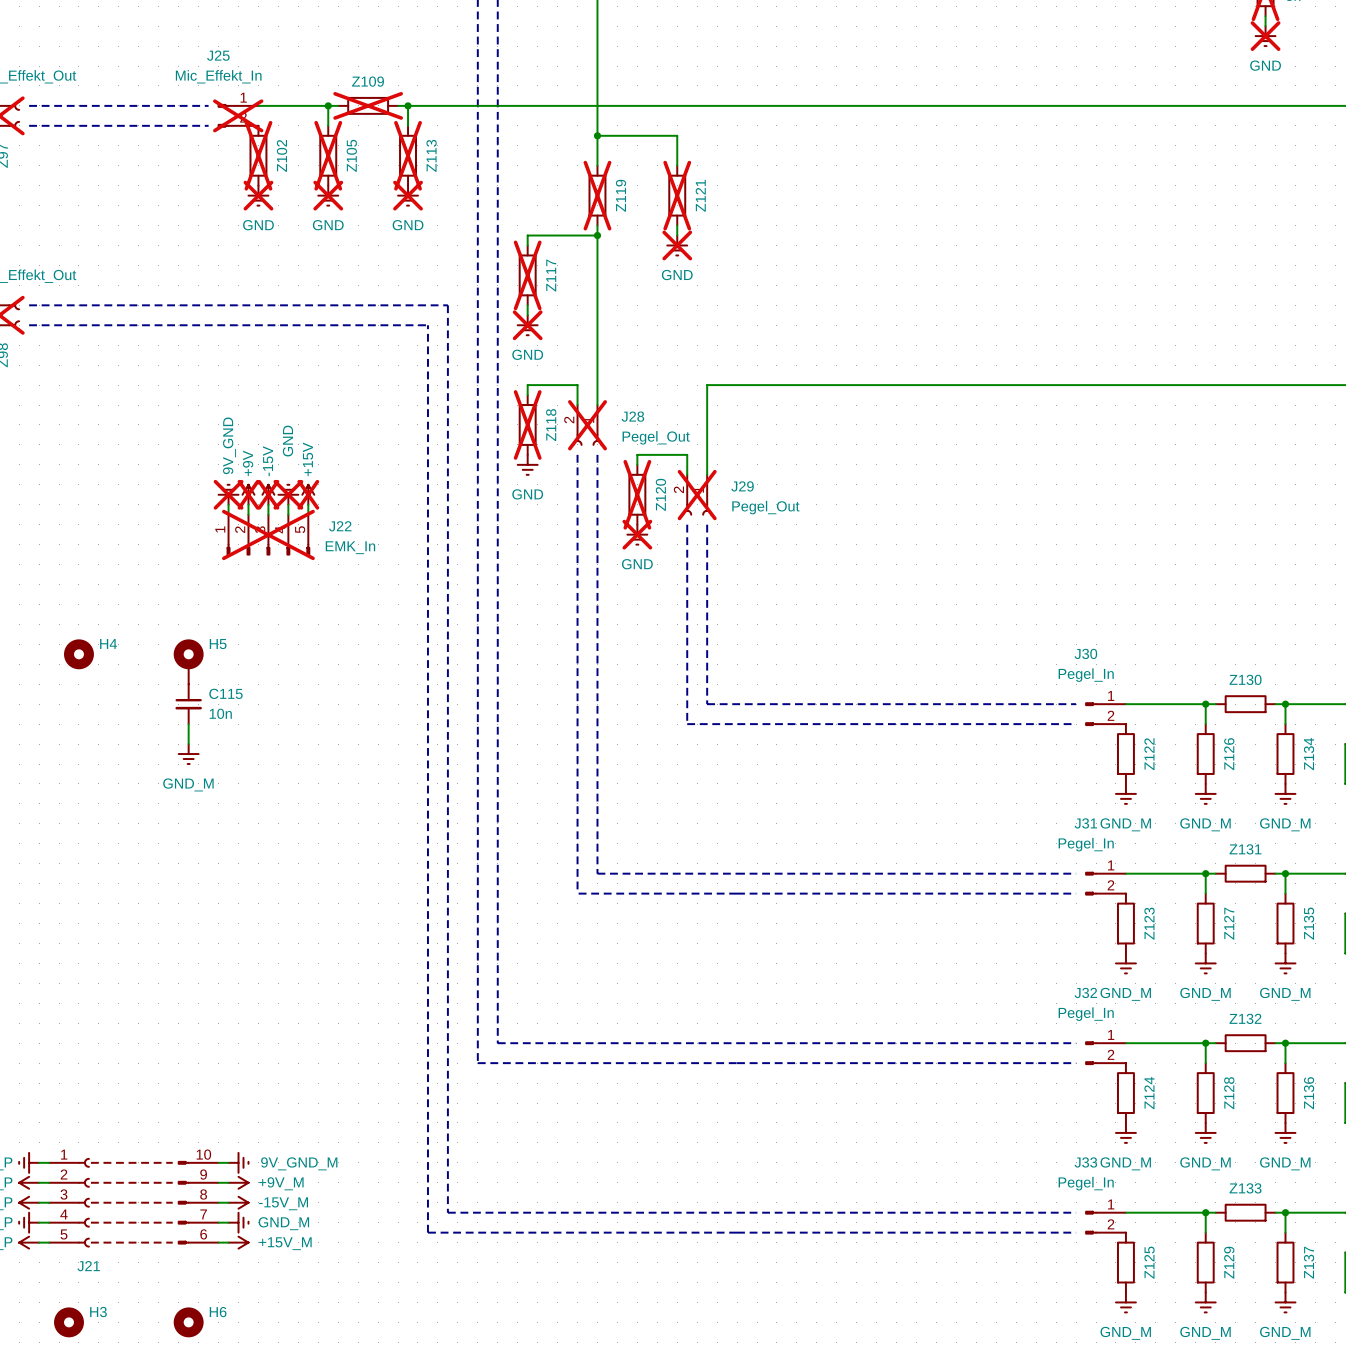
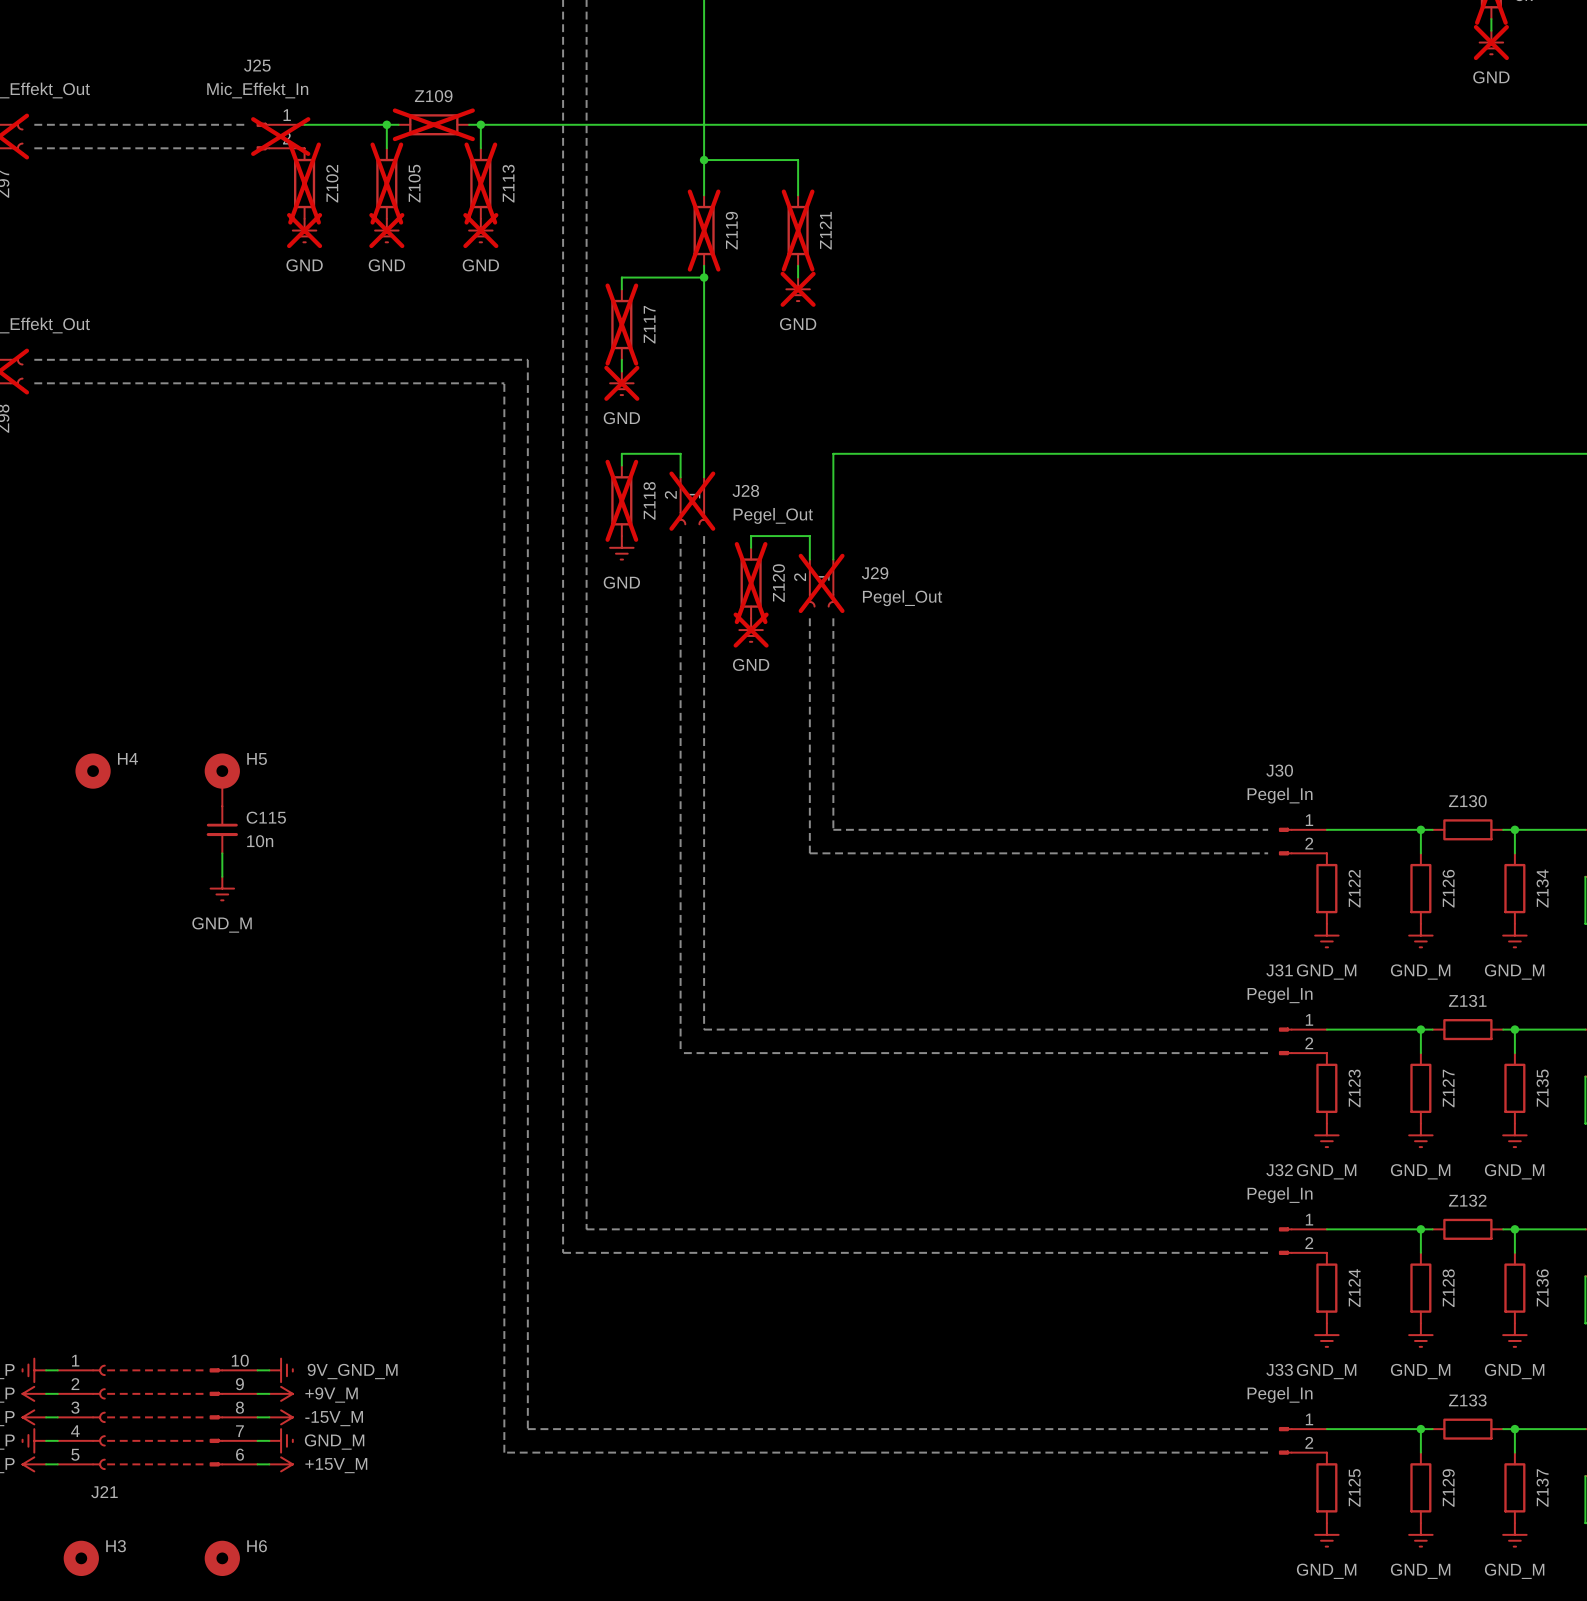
power symbol: 9V_GND (228, 494) -> none
power symbol: +9V (248, 494) -> none
power symbol: -15V (268, 494) -> none
power symbol: GND (288, 494) -> none
power symbol: +15V (308, 494) -> none
wire: (228, 504) (228, 514) -> none
wire: (248, 504) (248, 514) -> none
wire: (268, 504) (268, 514) -> none
wire: (288, 504) (288, 514) -> none
wire: (308, 504) (308, 514) -> none
J22: EMK_In (268, 534) -> none

